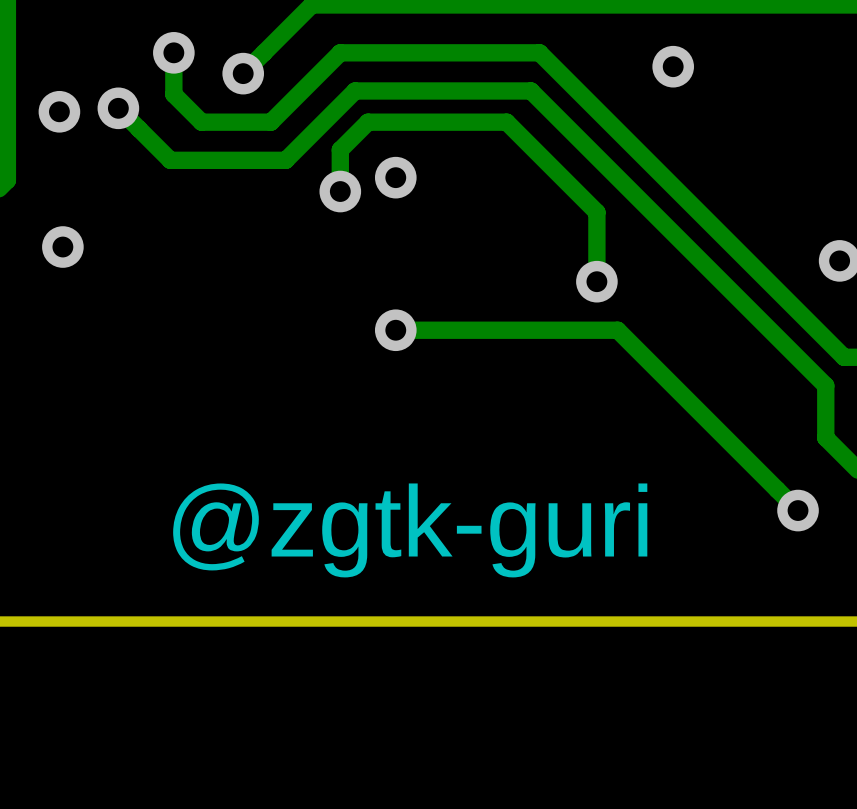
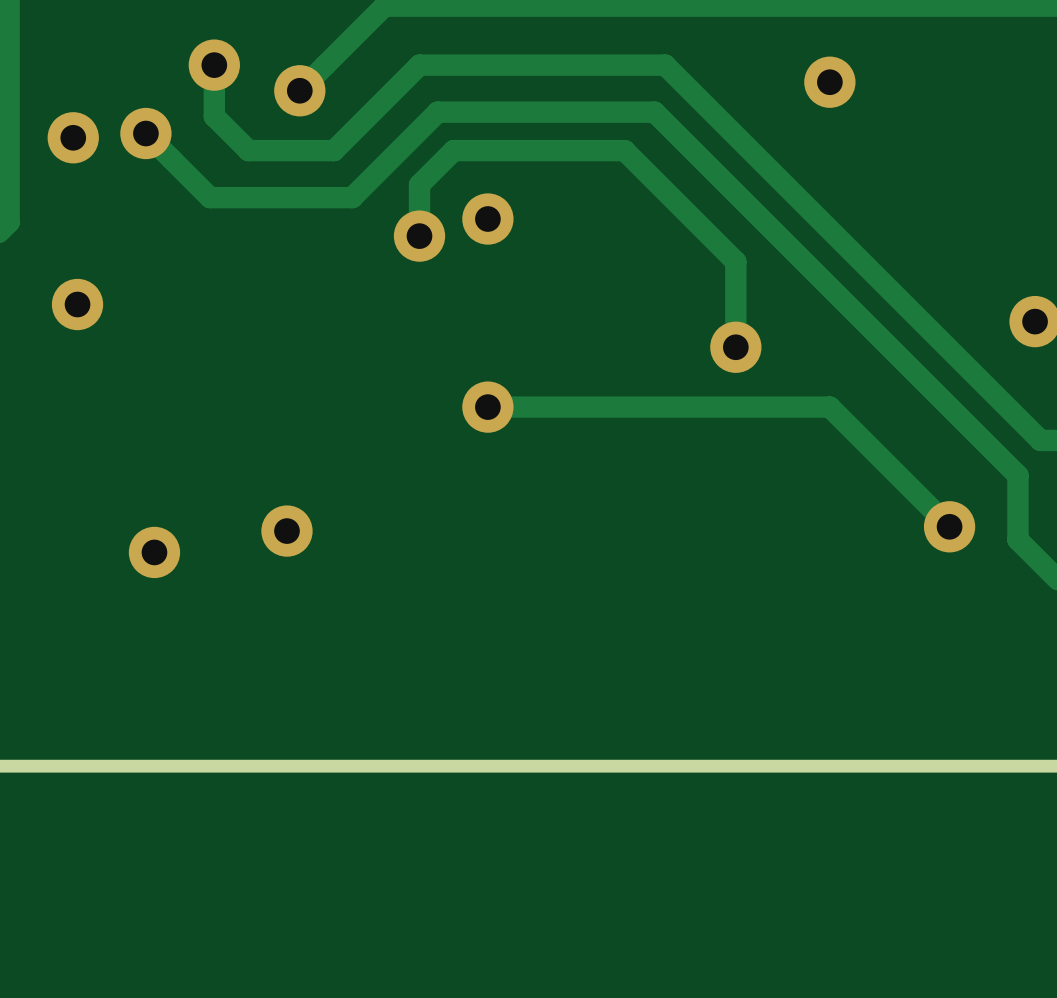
track: (617, 330) (798, 510) -> (761, 407) (829, 407) (949, 526)
via: none -> (286, 531)
via: none -> (154, 552)
via position: (798, 510) -> (949, 526)
text: @zgtk-guri (410, 530) -> none

